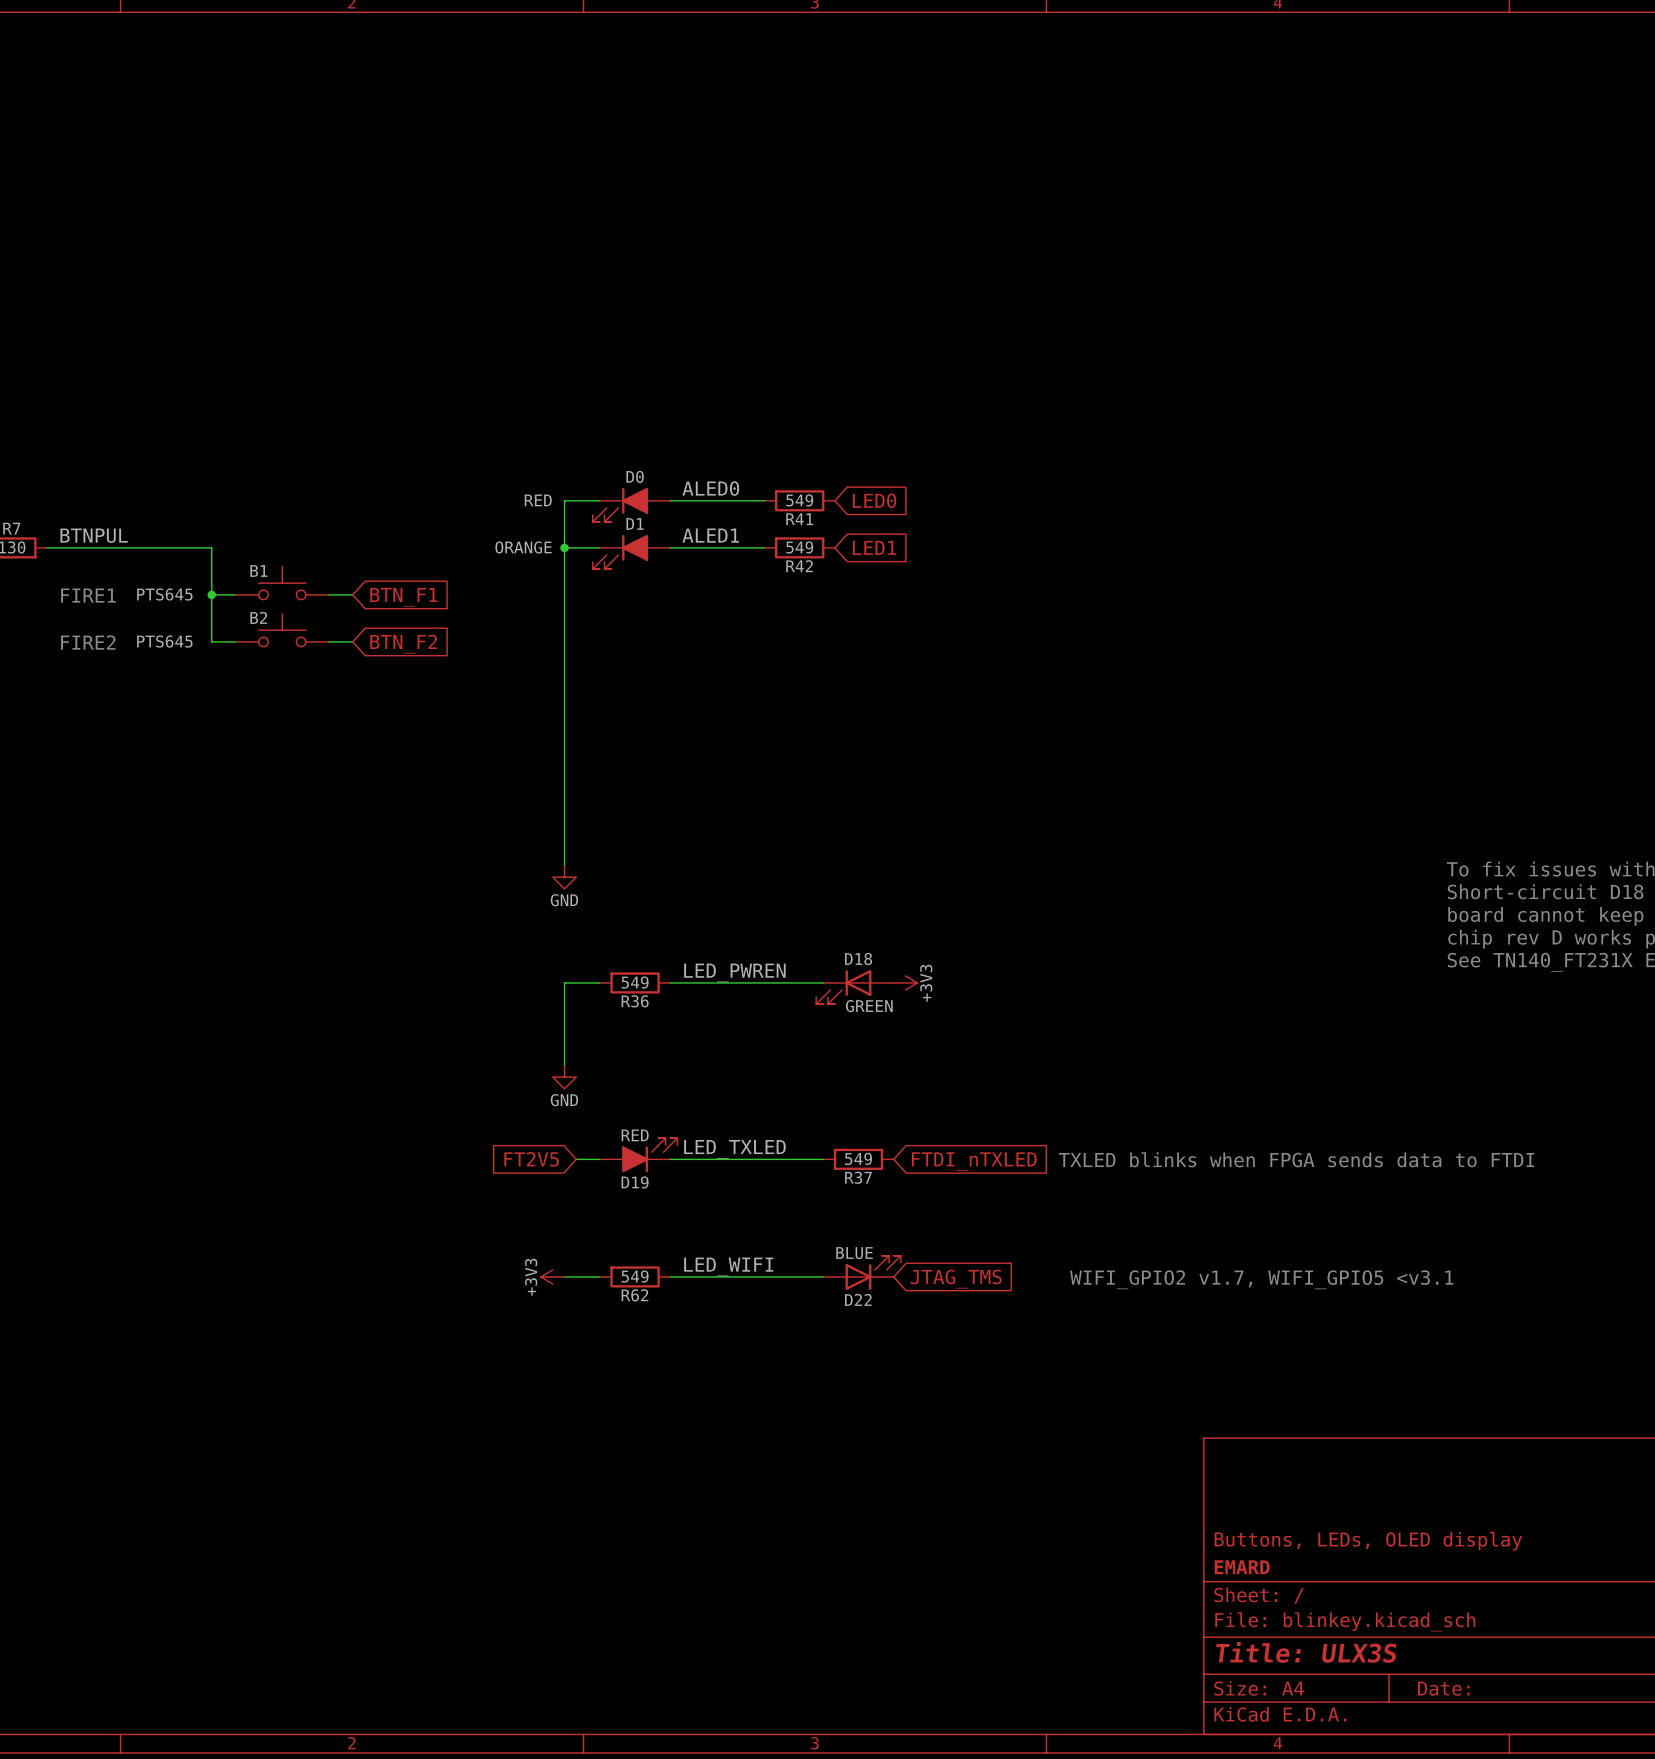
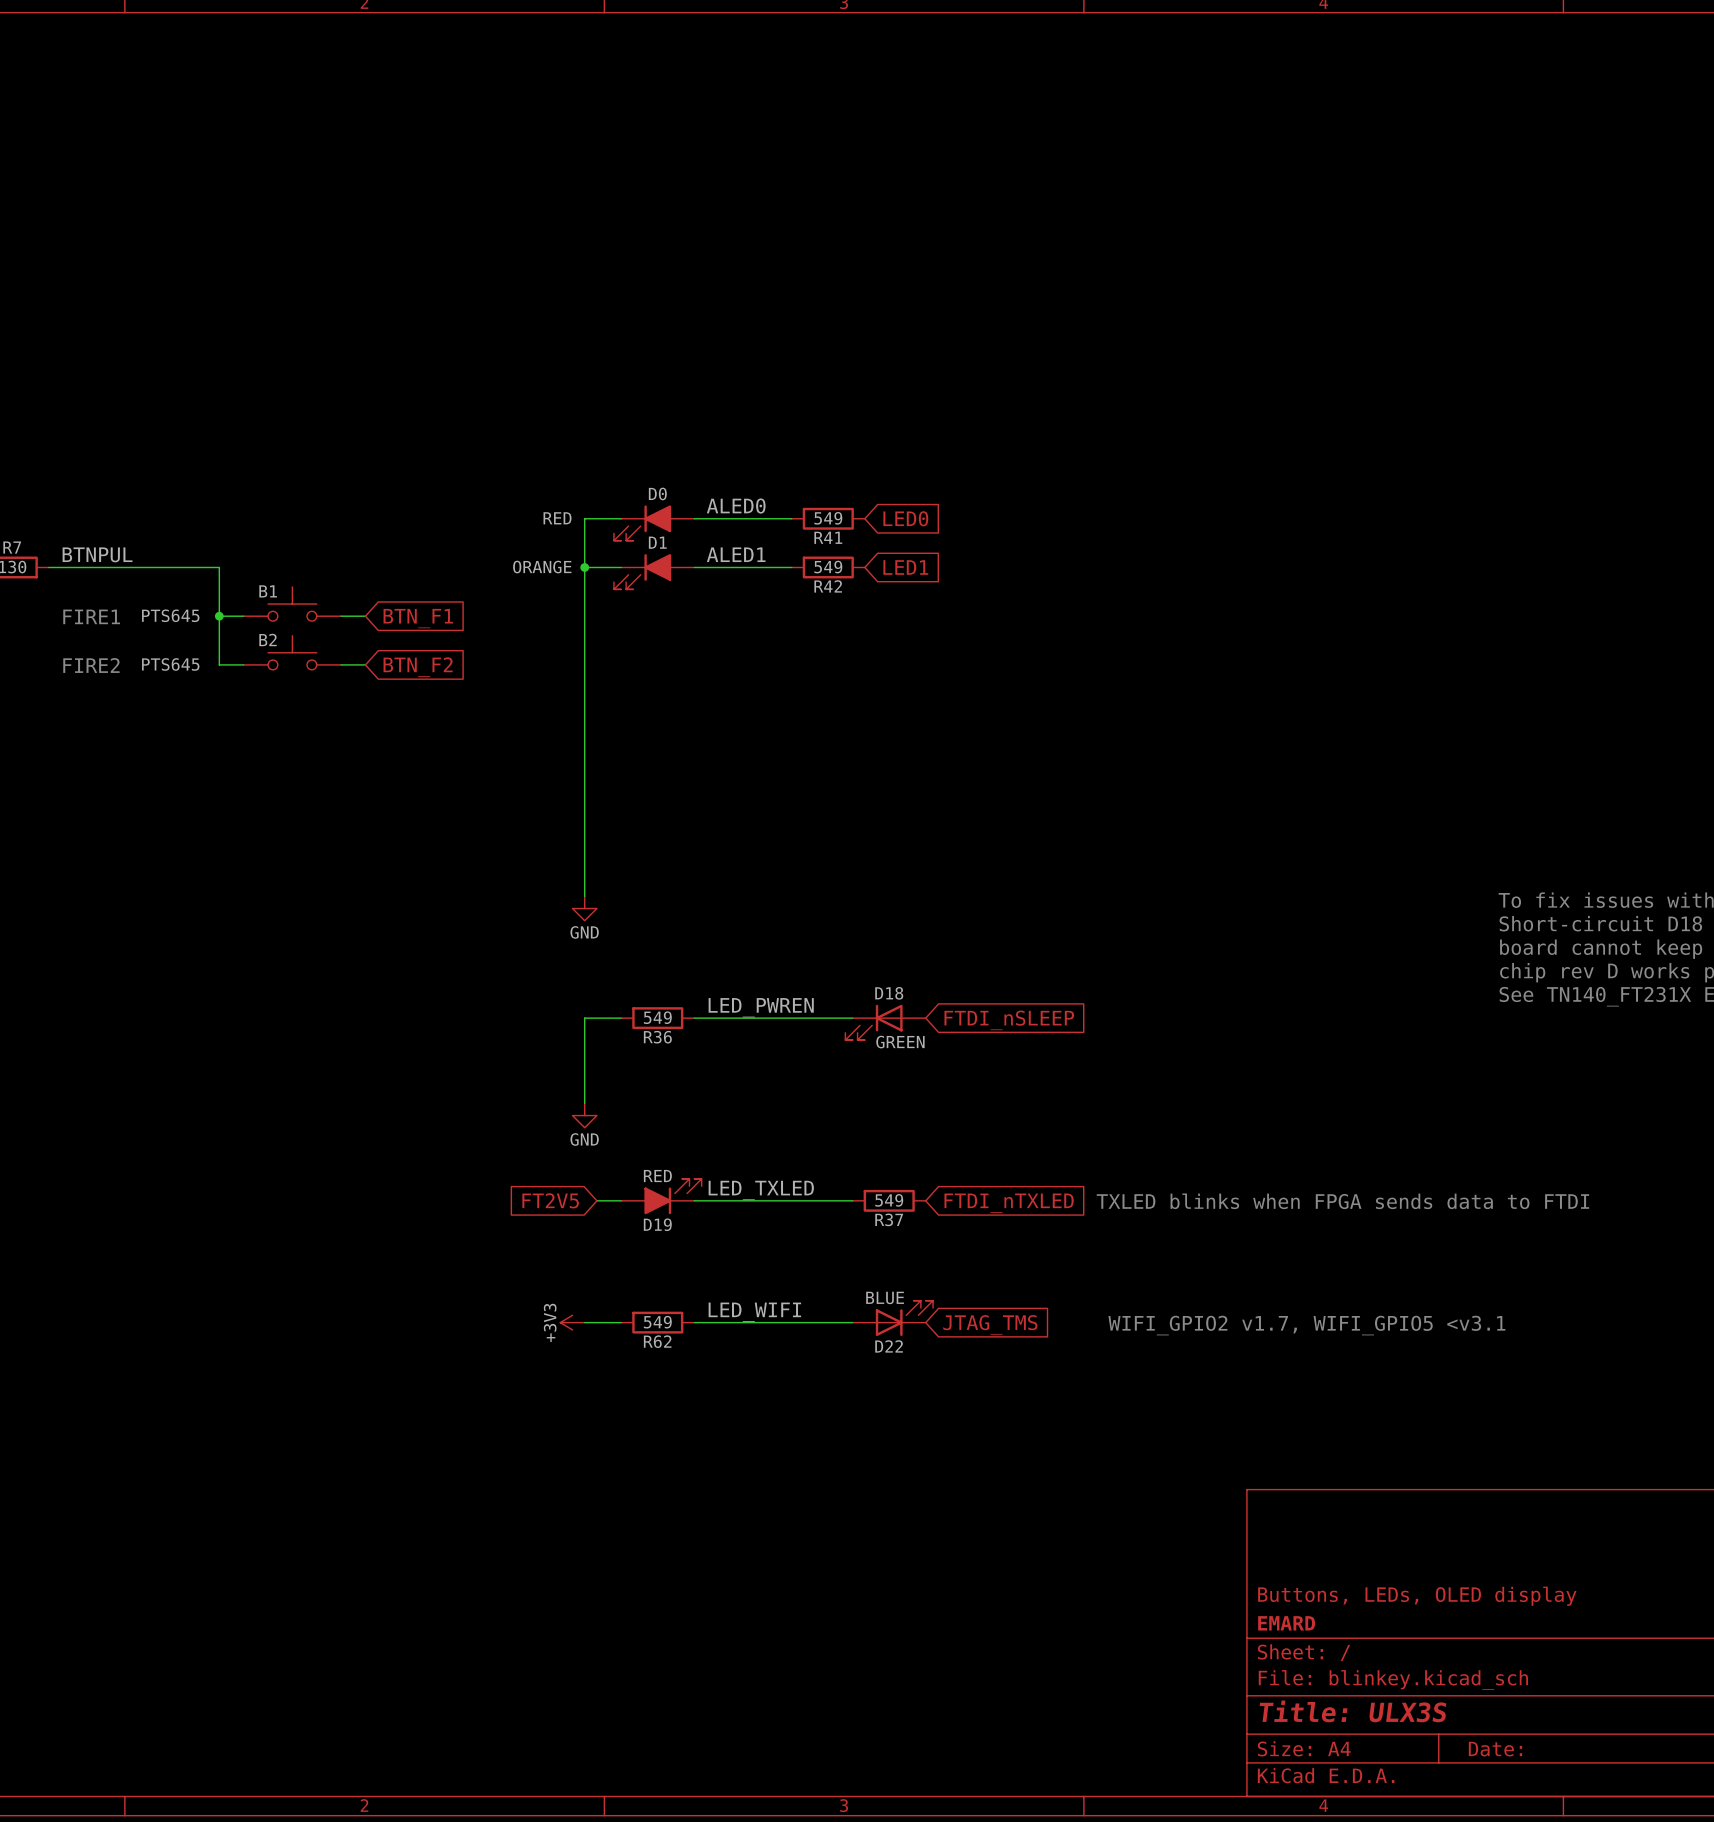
power symbol: +3V3 (905, 982) -> none
global label: none -> FTDI_nSLEEP (1009, 1020)

